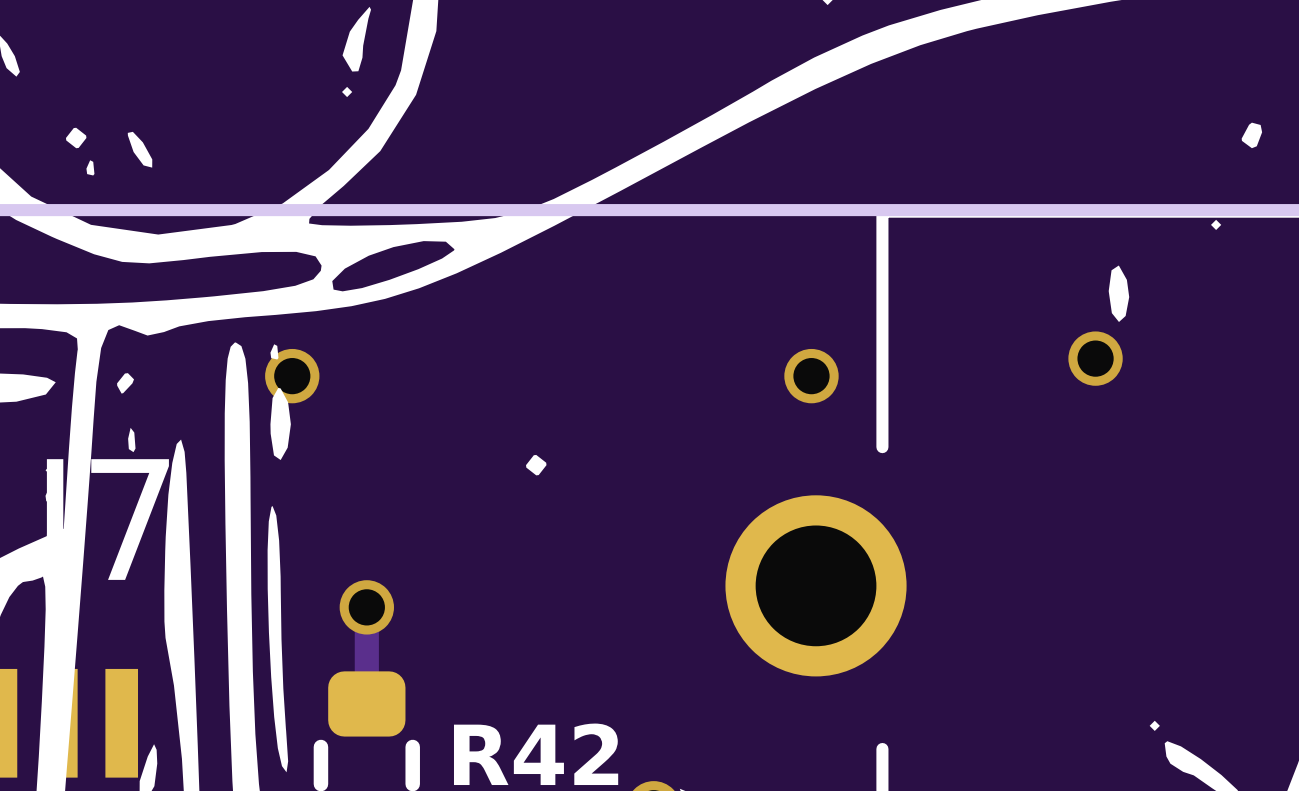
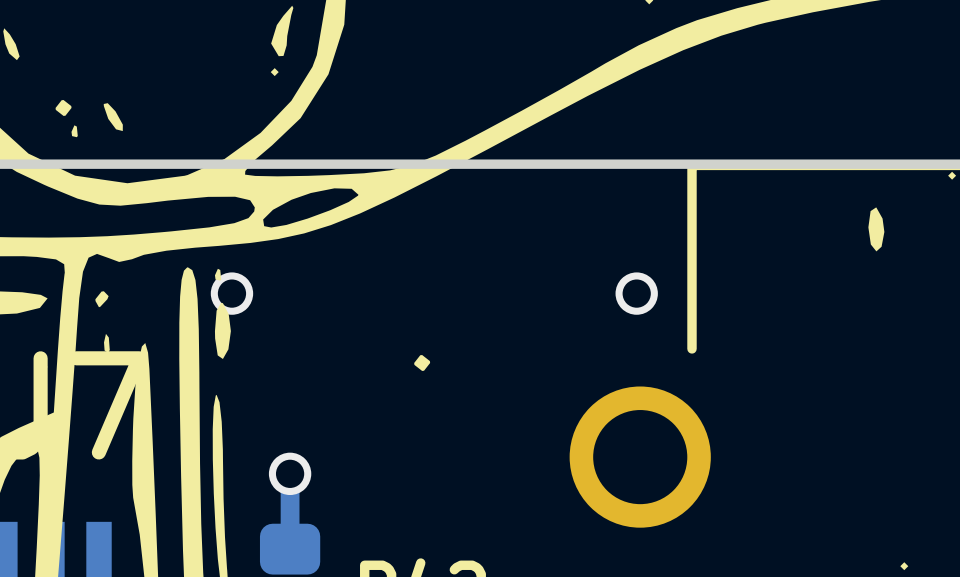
via: (1095, 358) -> none

